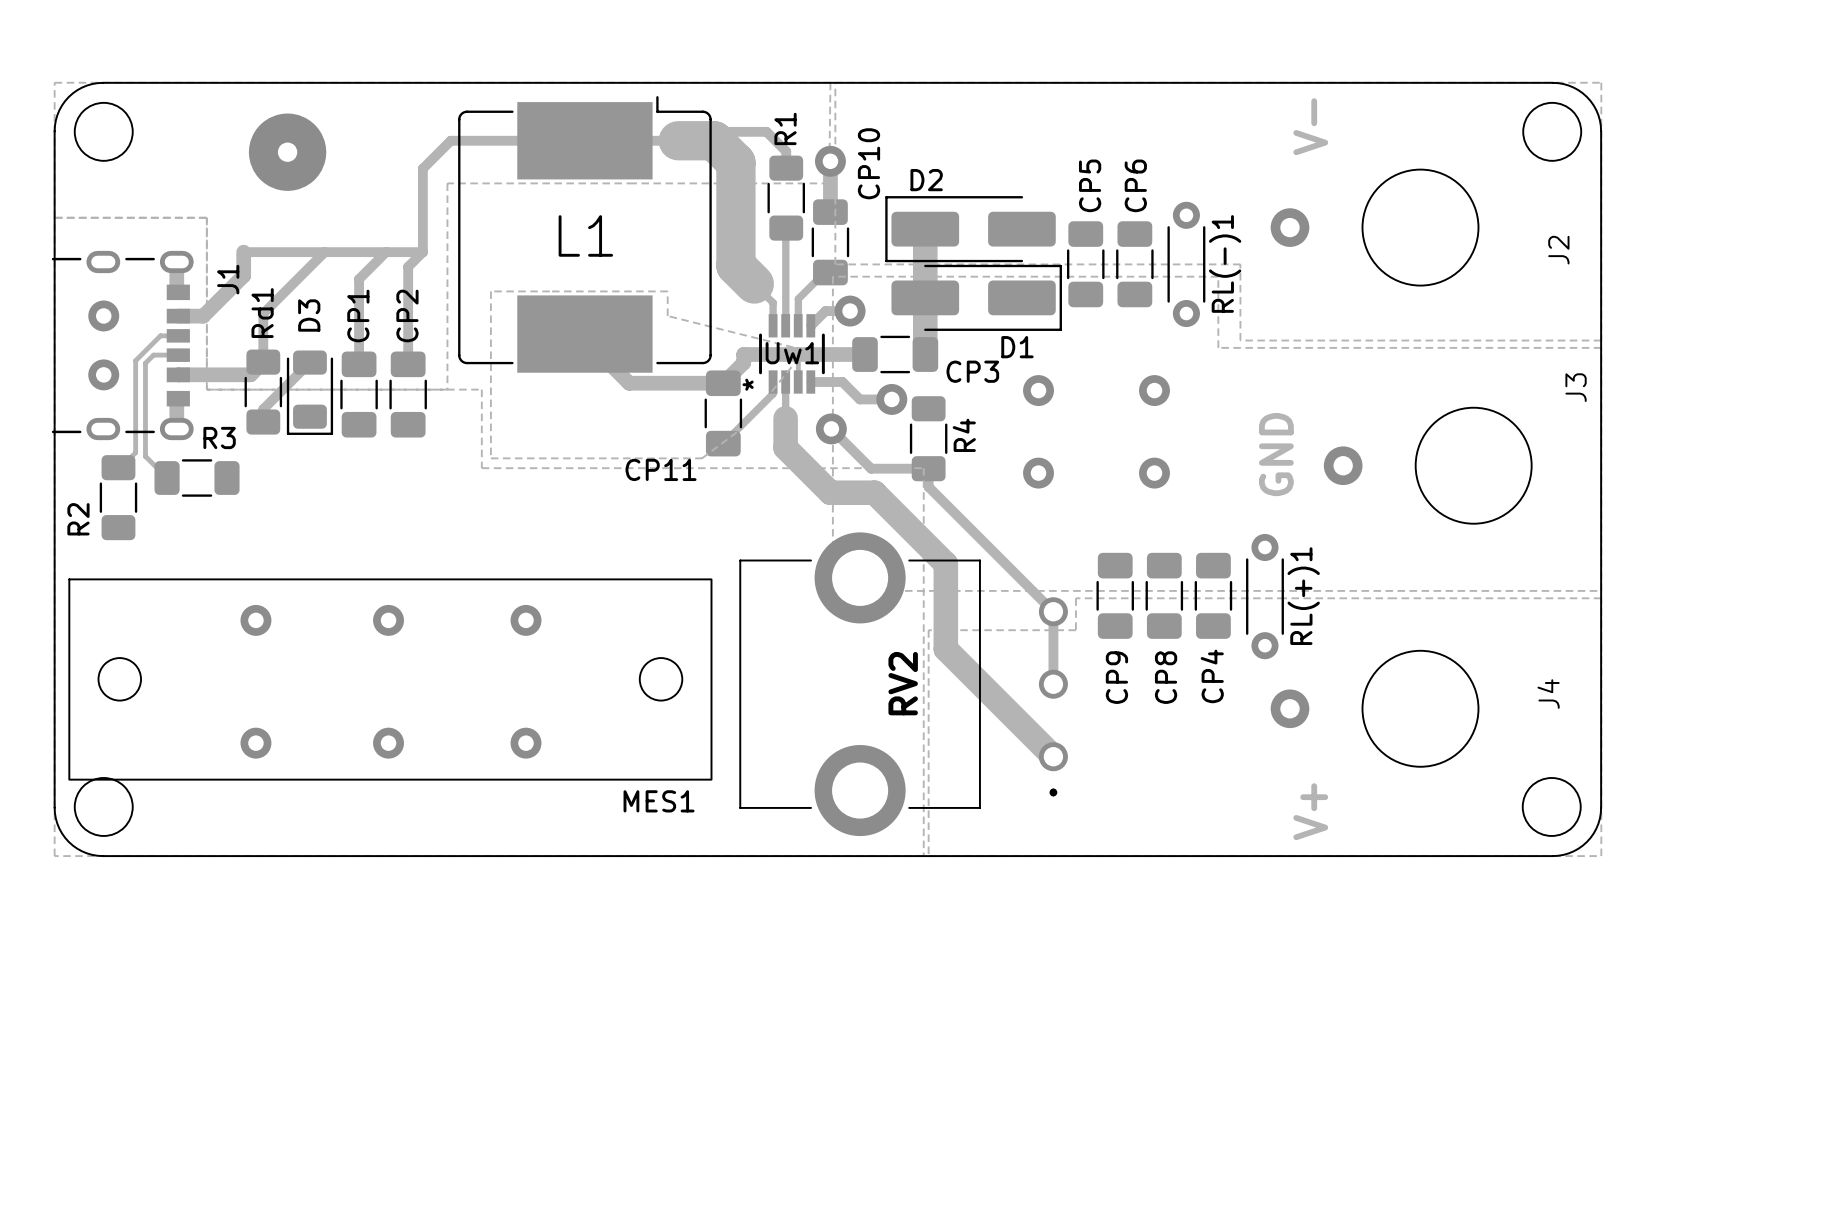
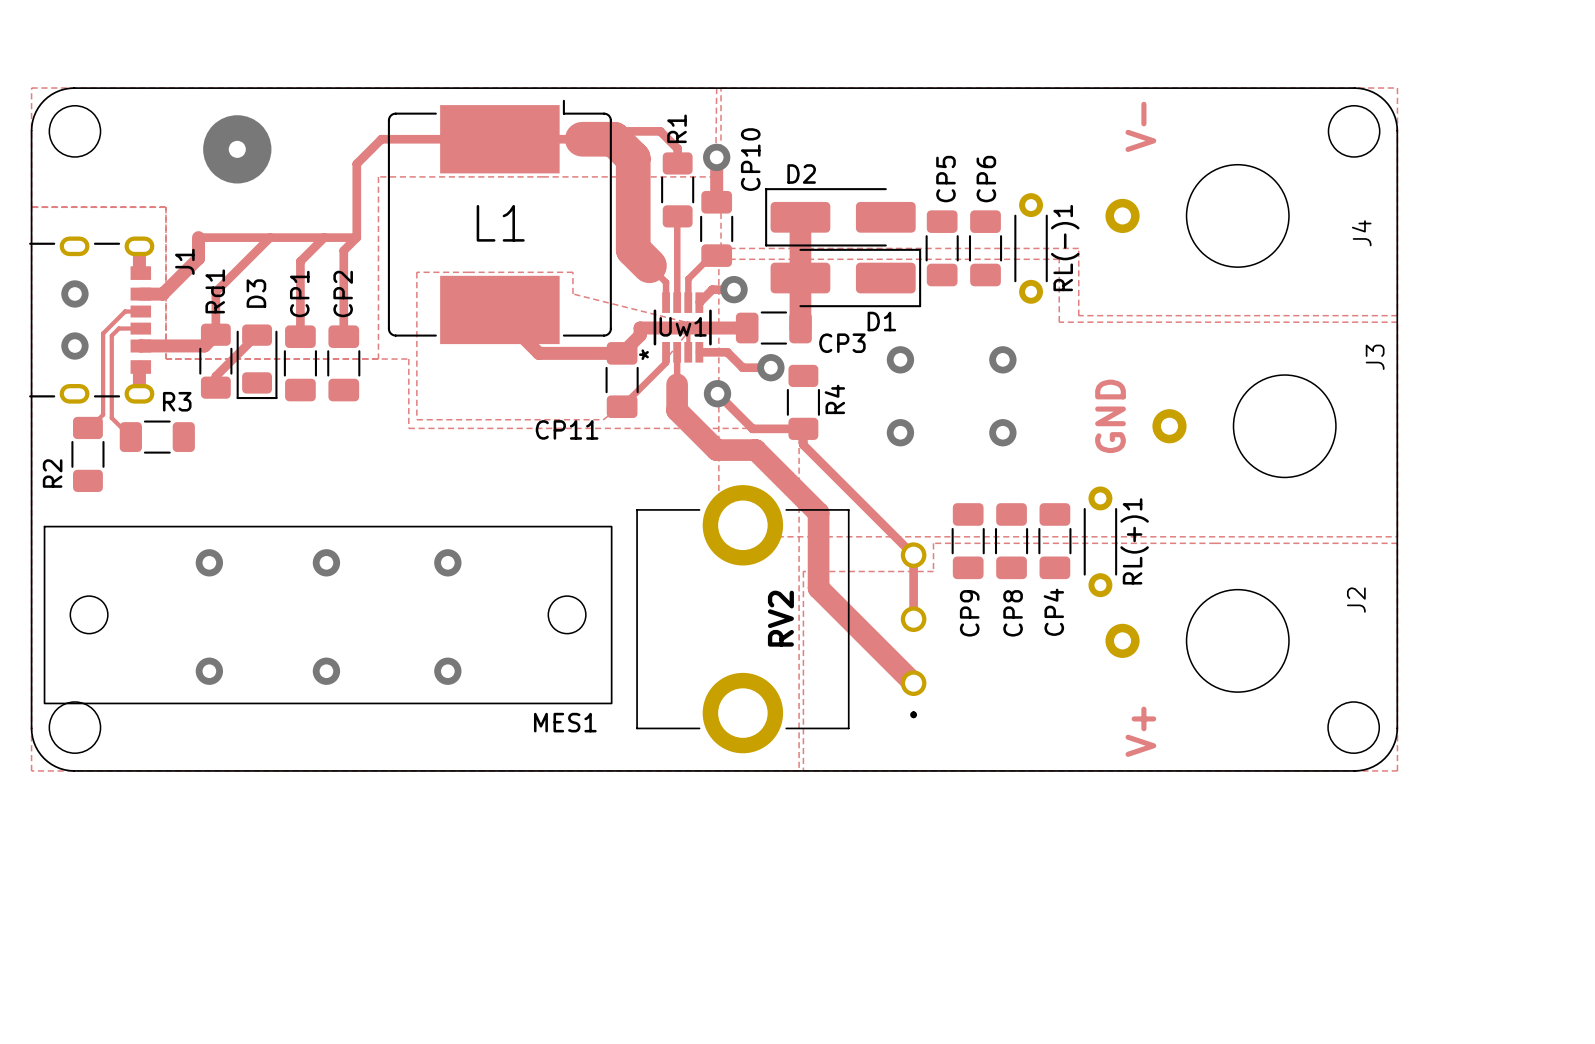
J2 name: J2 (1558, 250) -> J4 (1361, 233)
J4 name: J4 (1548, 694) -> J2 (1356, 600)

